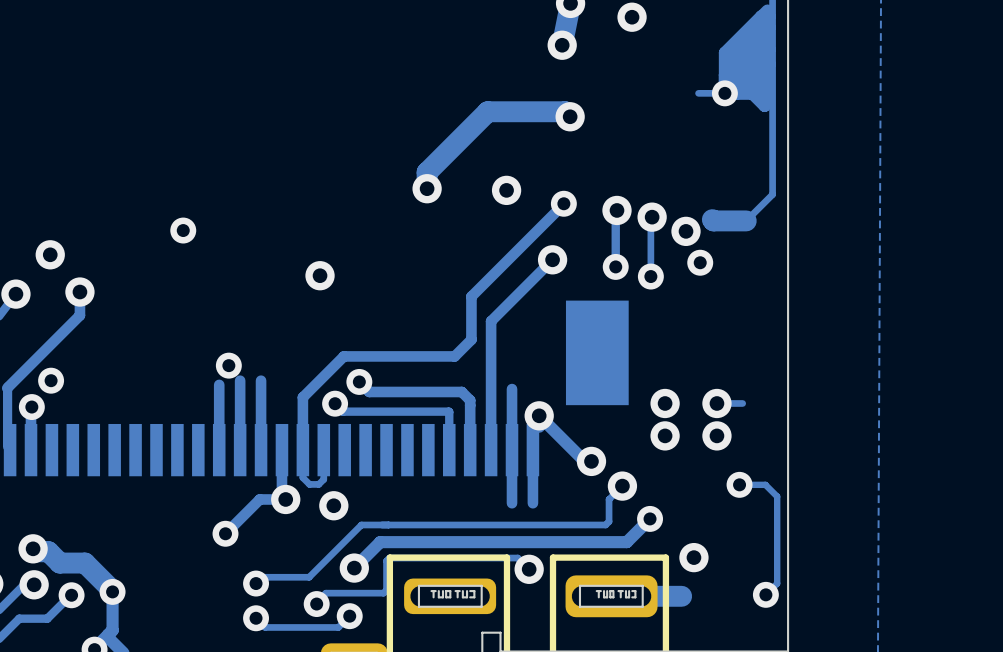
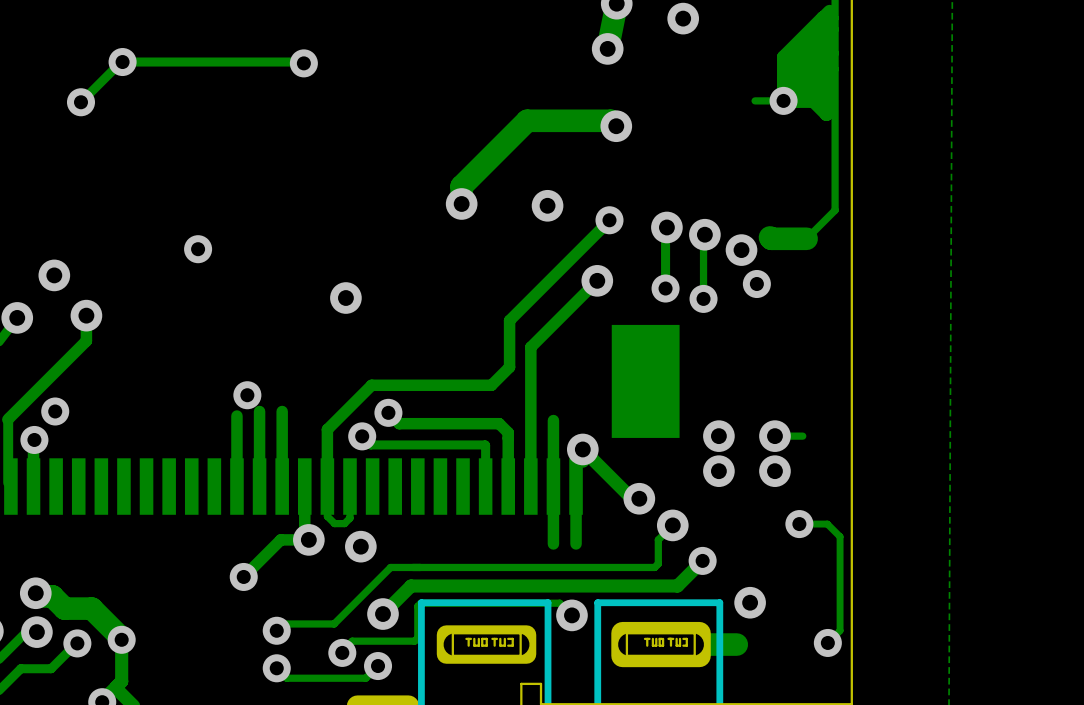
via: none -> (122, 62)
track: none -> (303, 63) (121, 62) (80, 102)
via: none -> (303, 63)
via: none -> (80, 102)

